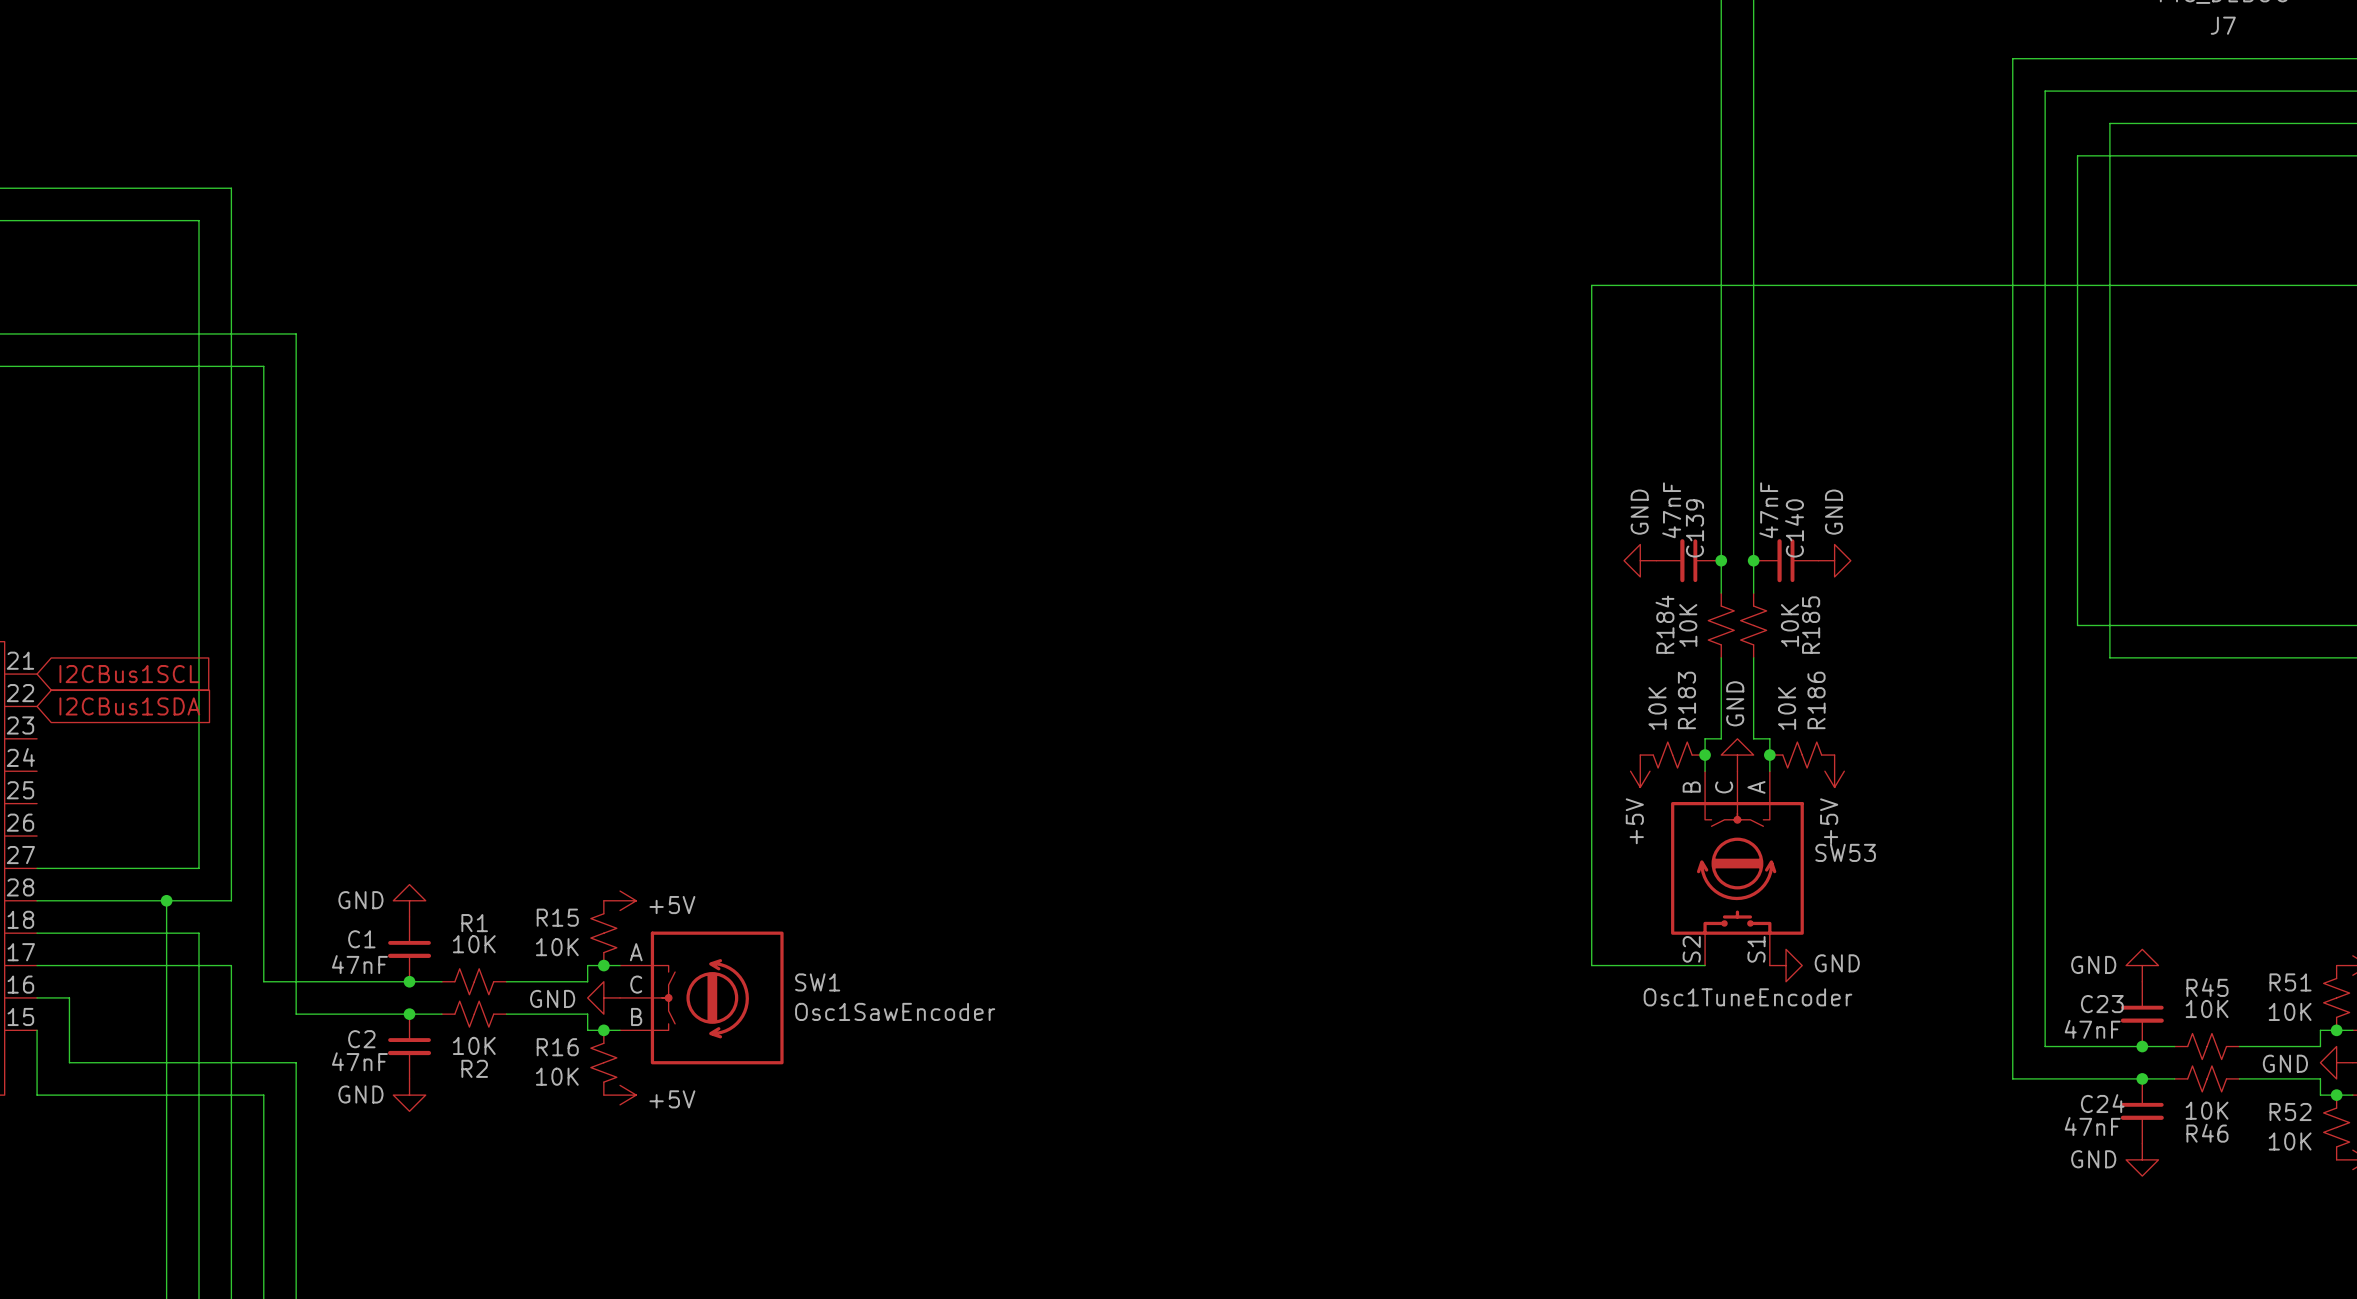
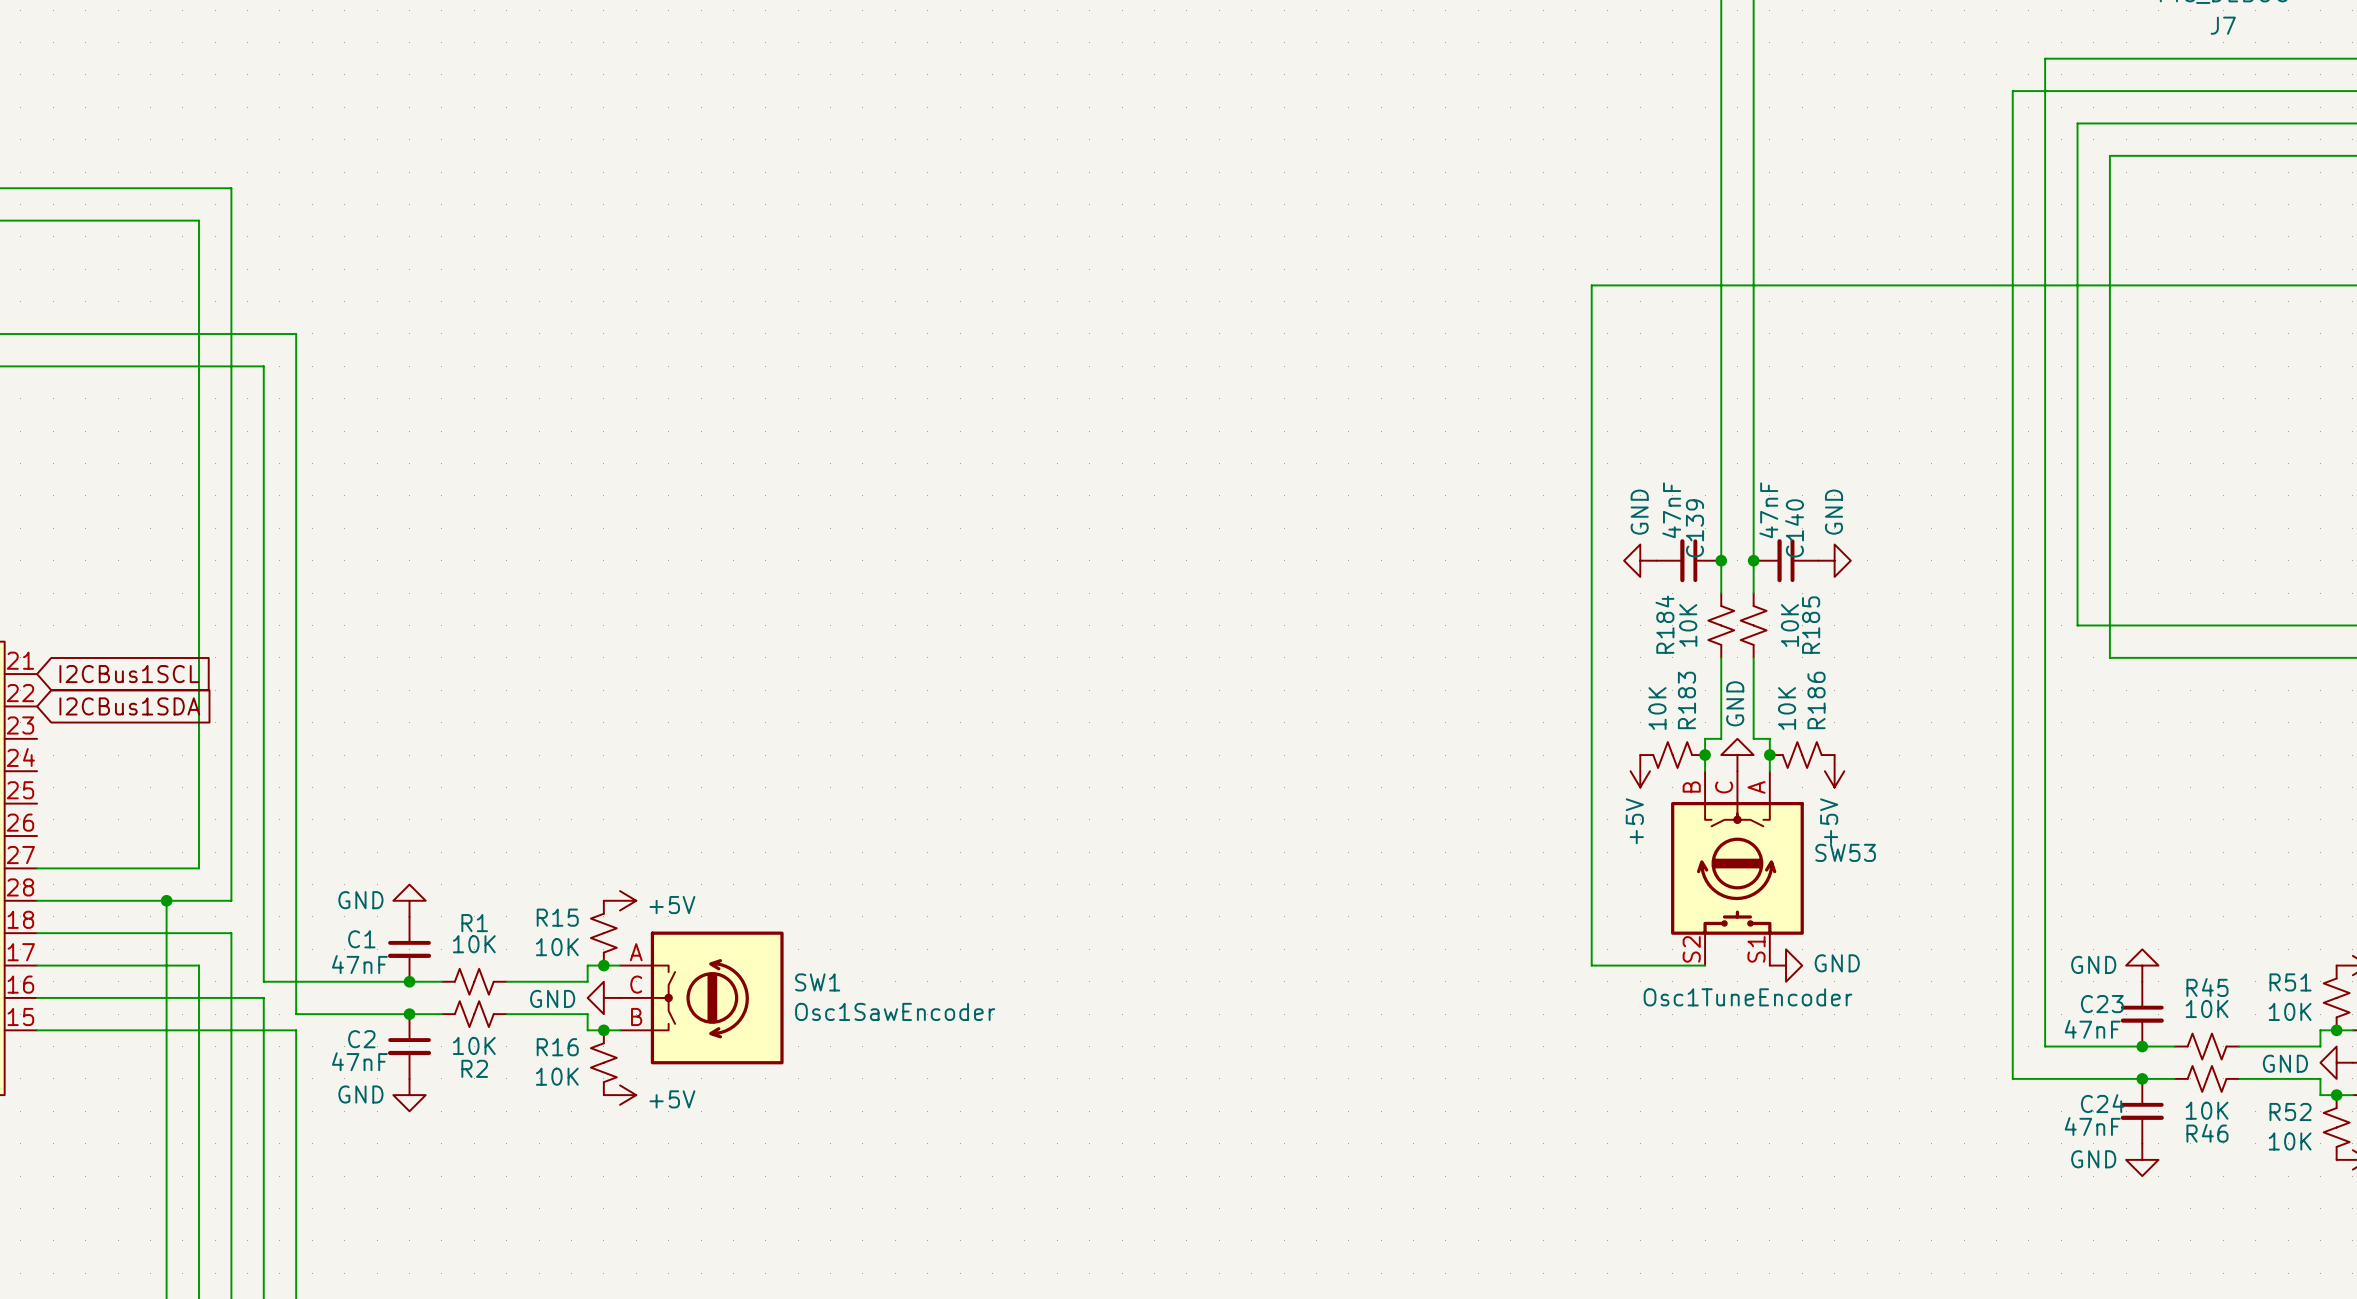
wire: (2045, 58) (2012, 58) (2012, 91) -> (2045, 58) (2045, 91) (2012, 91)
wire: (2109, 123) (2109, 155) (2077, 155) -> (2109, 123) (2077, 123) (2077, 155)
wire: (199, 933) (199, 965) (231, 965) -> (199, 933) (231, 933) (231, 965)
wire: (69, 997) (69, 1062) (296, 1062) -> (37, 1030) (296, 1030) (296, 1062)
wire: (37, 1030) (37, 1095) (263, 1095) -> (69, 997) (263, 997) (263, 1095)

